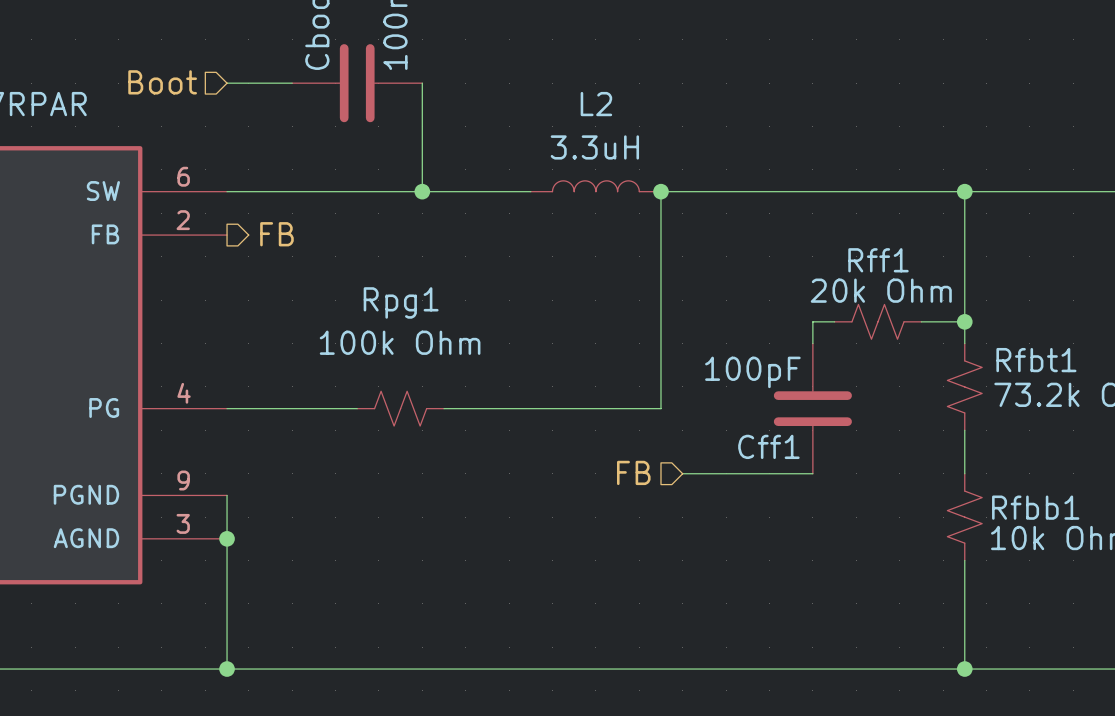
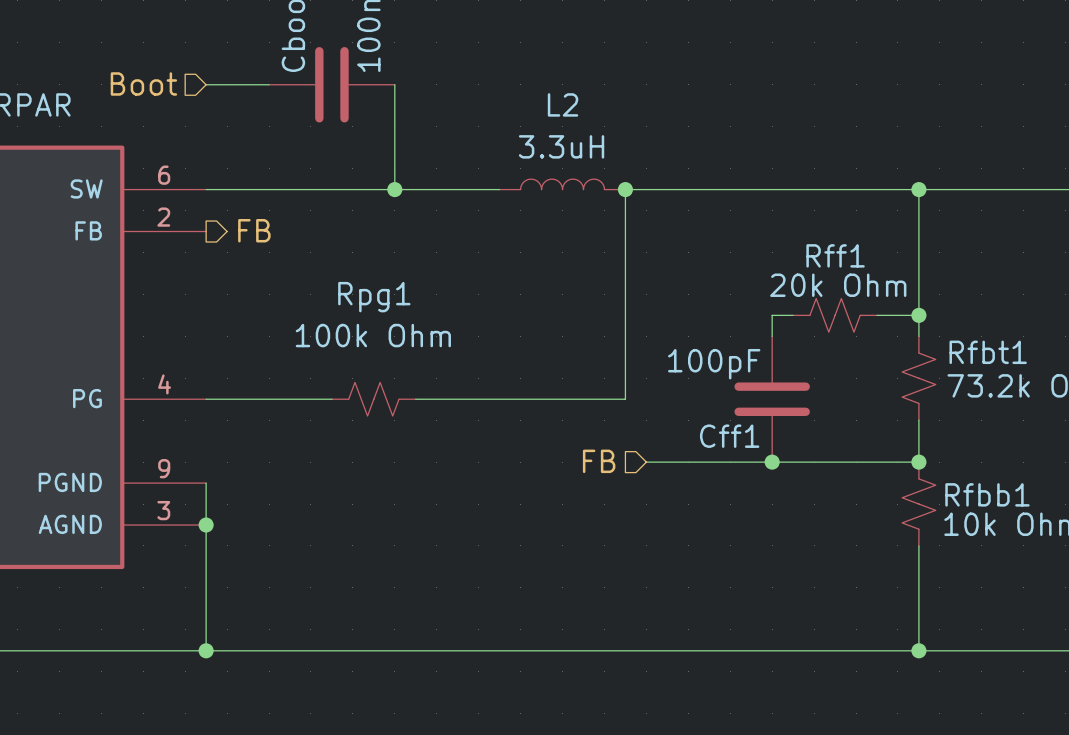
wire: none -> (772, 462) (918, 462)
junction: none -> (772, 462)
junction: none -> (918, 462)

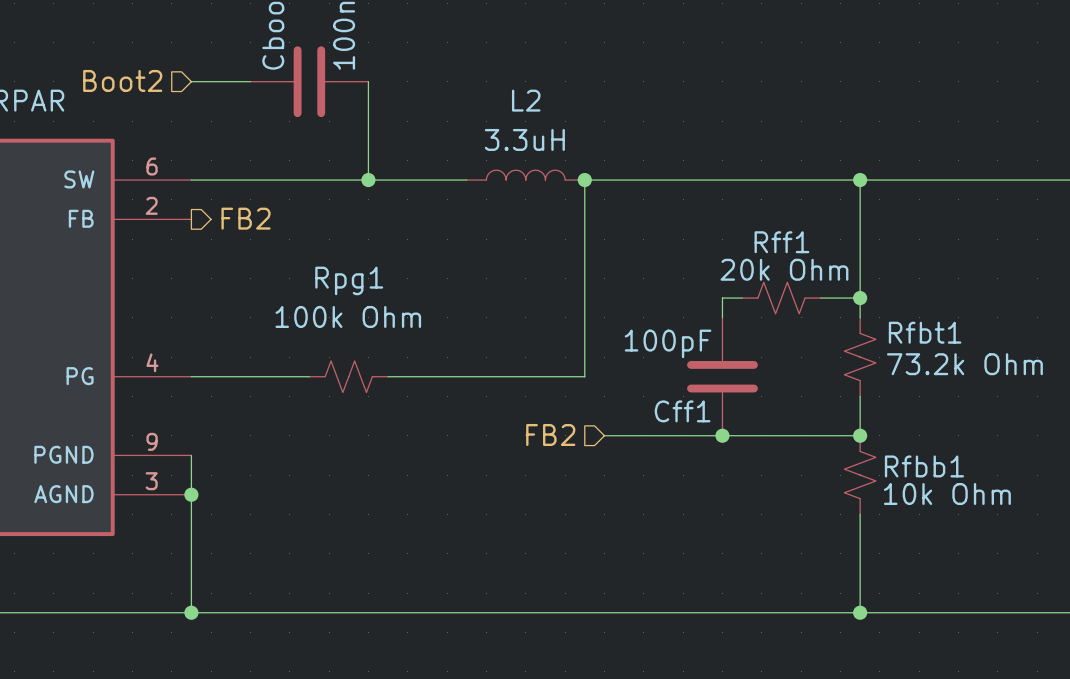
hierarchical label: Boot (143, 83) -> Boot2 (122, 80)
hierarchical label: FB (254, 230) -> FB2 (246, 218)
hierarchical label: FB (599, 461) -> FB2 (550, 434)

